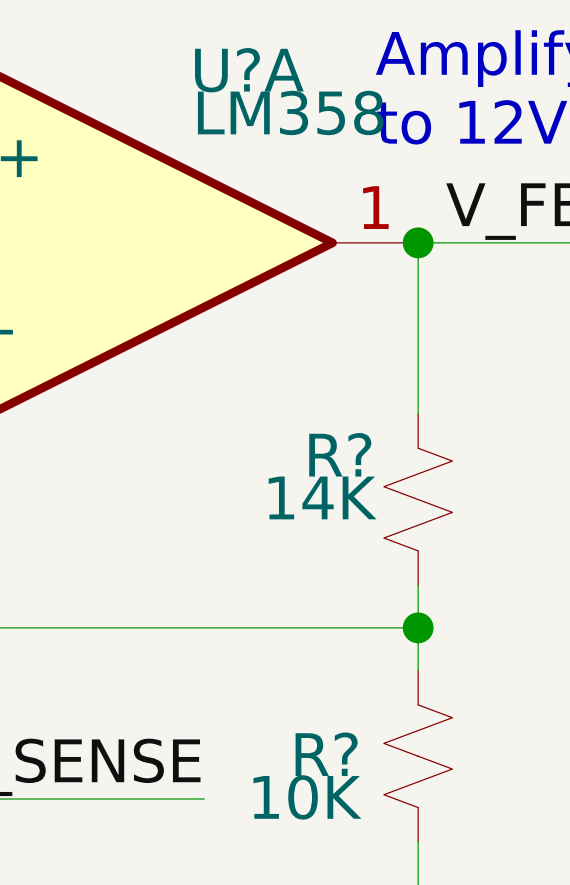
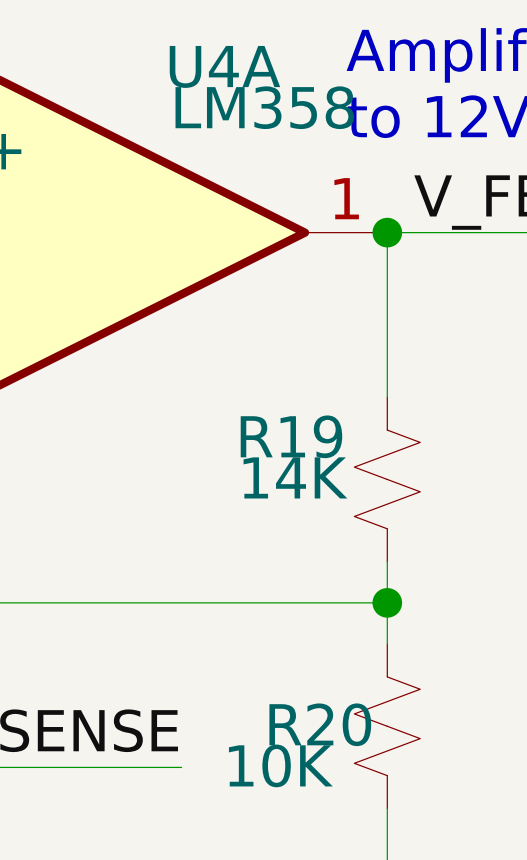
U?A name: U?A (249, 70) -> U4A (224, 66)
R? name: R? (340, 454) -> R19 (291, 436)
R? name: R? (326, 754) -> R20 (320, 724)

